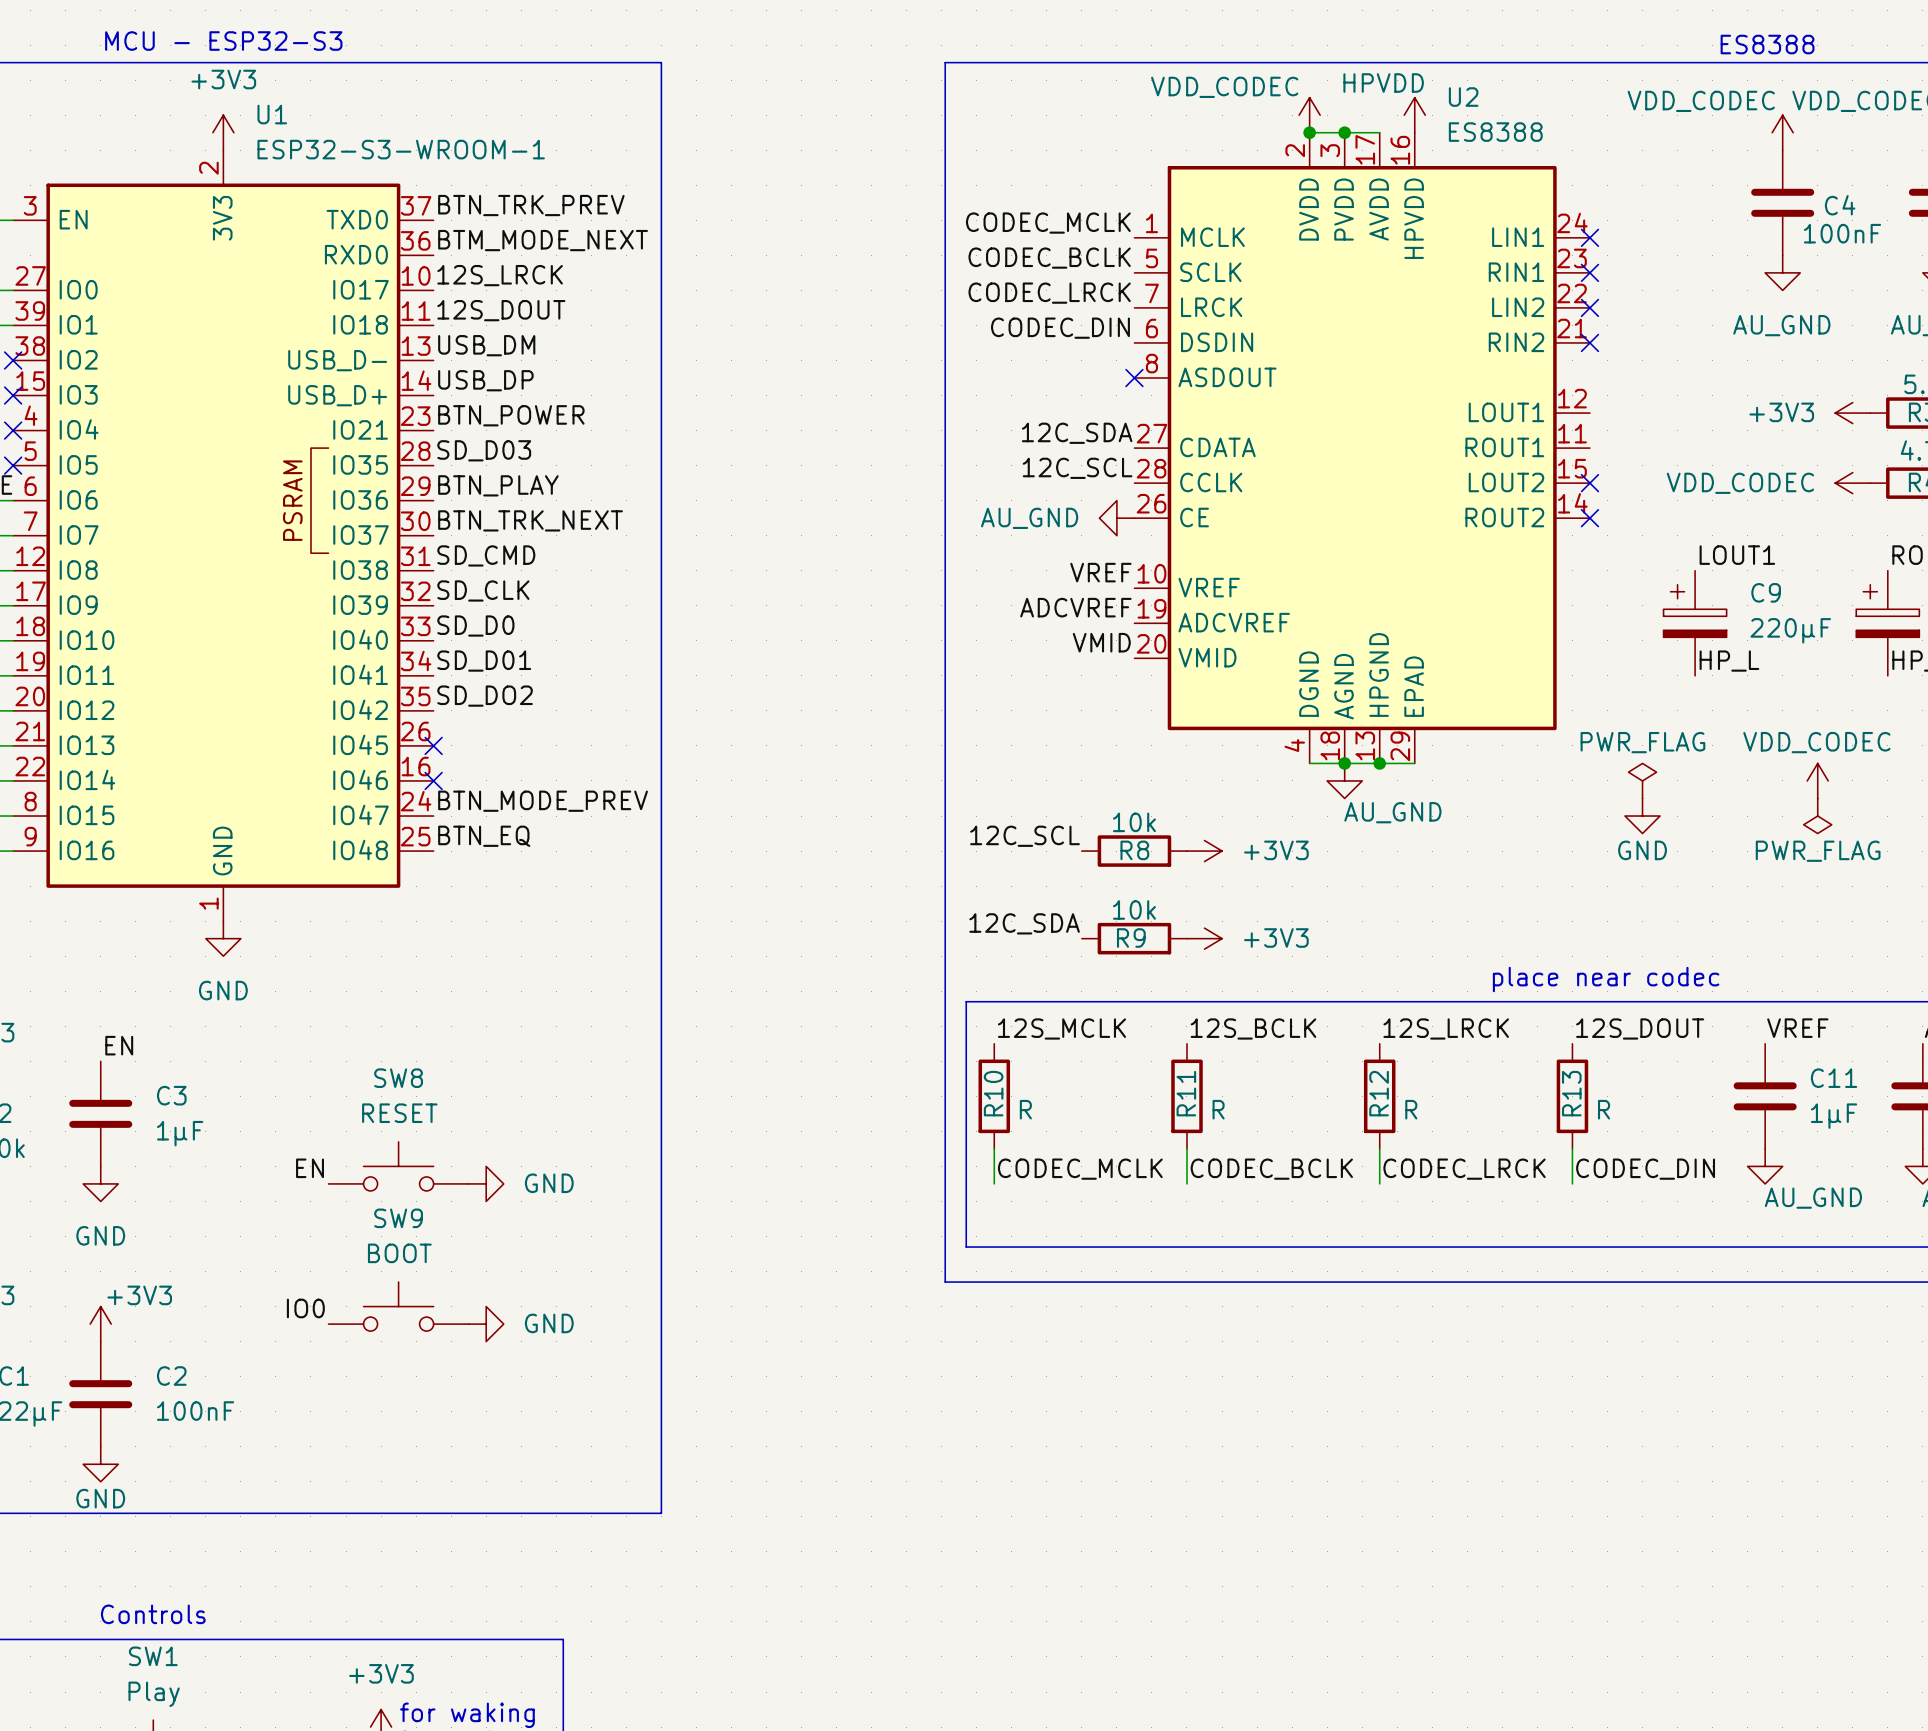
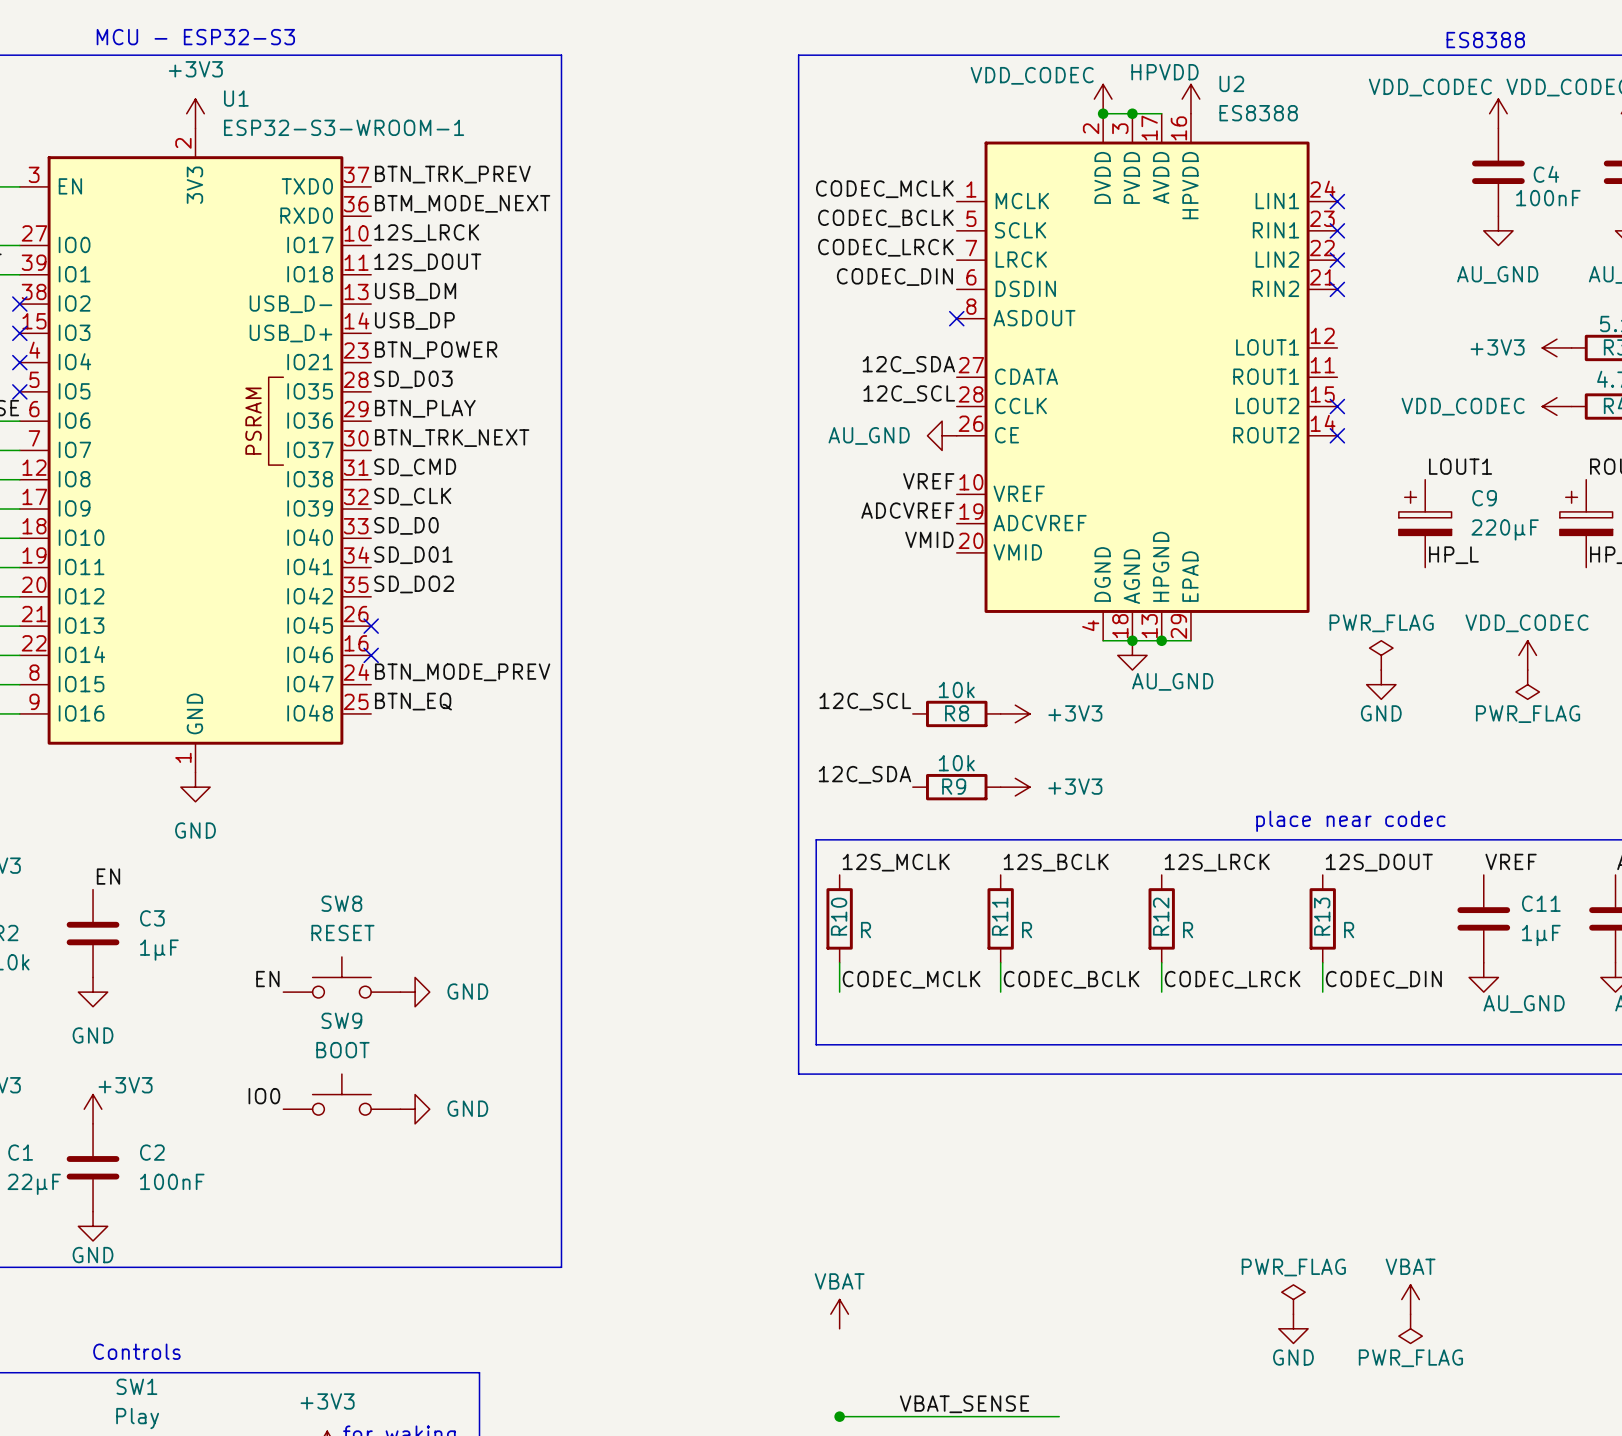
power symbol: none -> PWR_FLAG (1293, 1299)
power symbol: none -> VBAT (1410, 1299)
power symbol: none -> VBAT (839, 1314)
power symbol: none -> GND (1293, 1328)
power symbol: none -> PWR_FLAG (1410, 1328)
label: none -> VBAT_SENSE (964, 1404)
wire: none -> (839, 1416) (1059, 1416)
junction: none -> (839, 1416)

